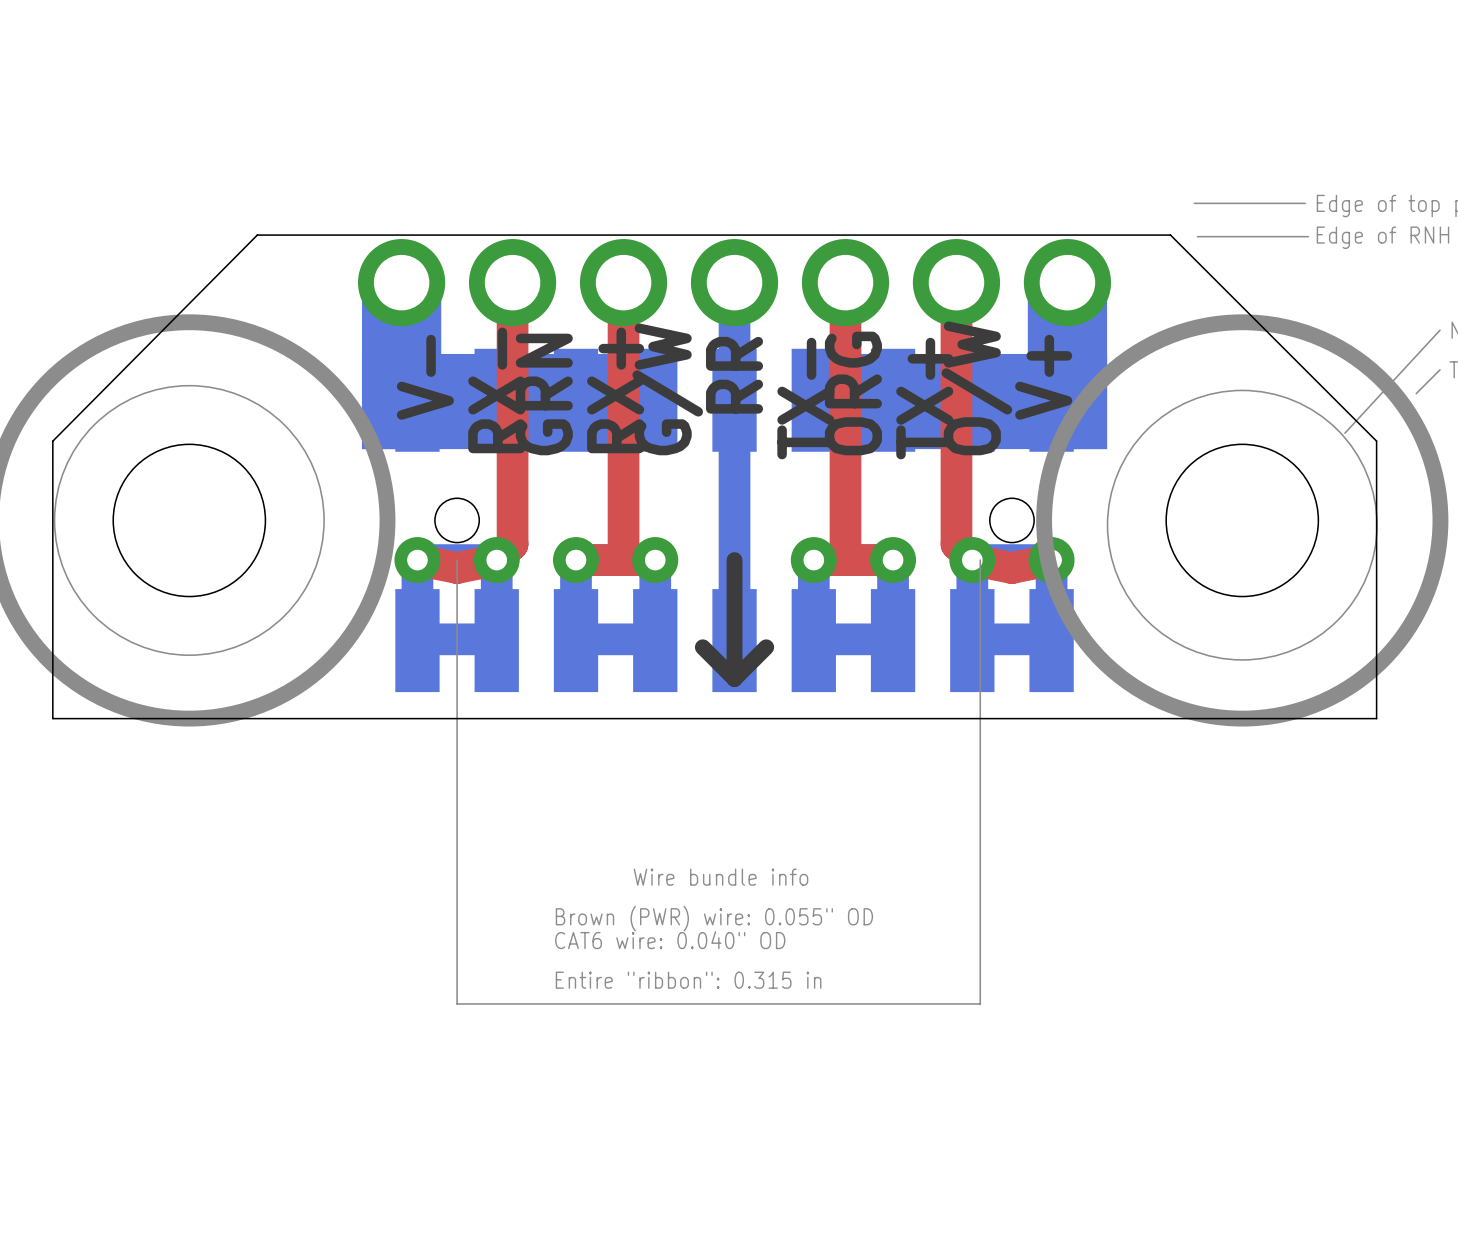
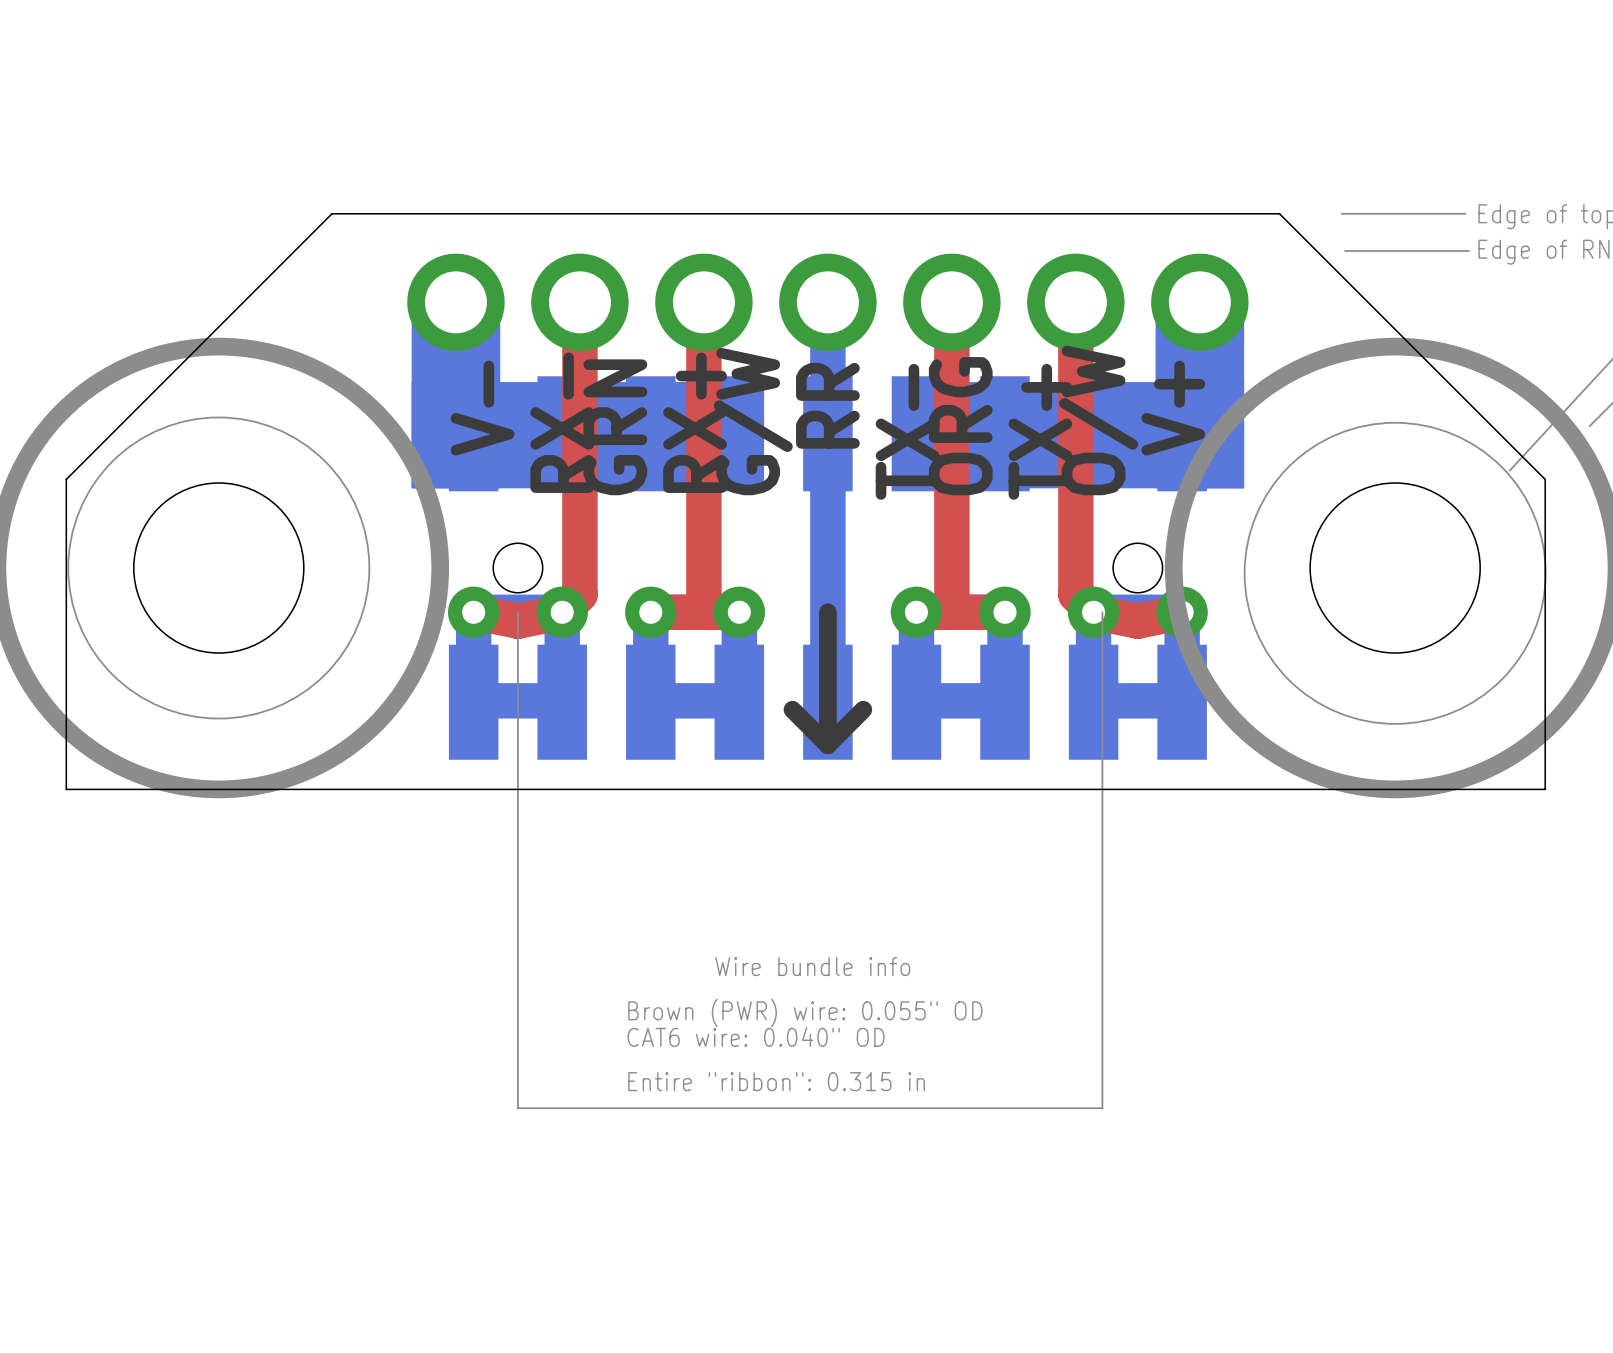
board edge: (1170, 235) (257, 235) (52, 441) -> (1314, 249) (1279, 213) (331, 213) (66, 479)

